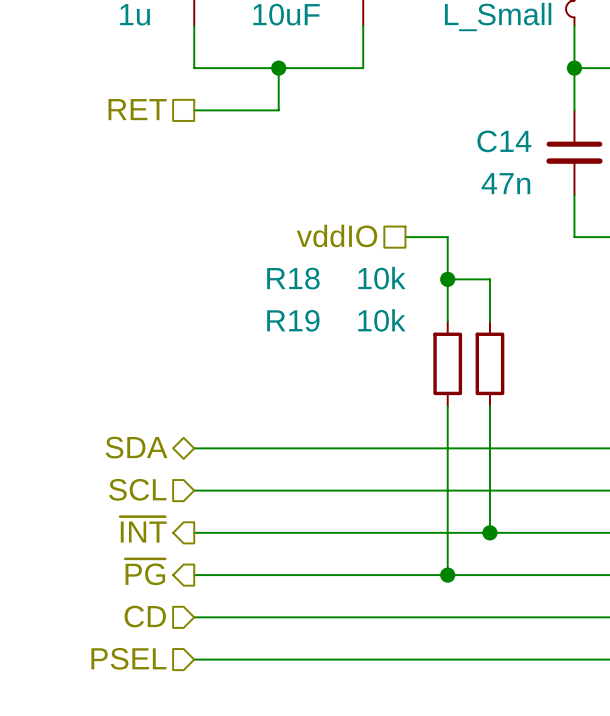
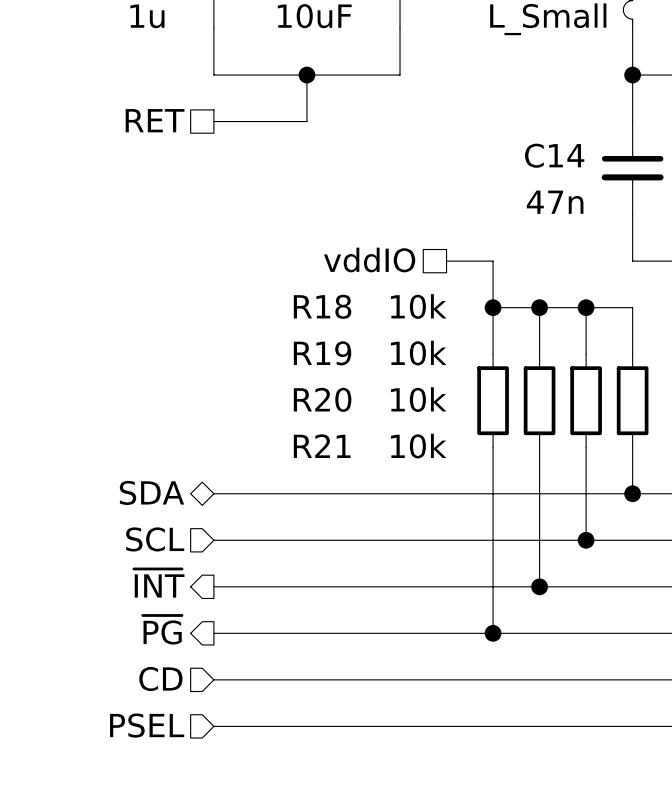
wire: none -> (539, 307) (632, 307) (632, 354)
junction: none -> (539, 307)
wire: none -> (586, 307) (586, 354)
junction: none -> (586, 307)
R20: none -> 10k (586, 400)
R21: none -> 10k (632, 400)
wire: none -> (586, 447) (586, 540)
wire: none -> (632, 447) (632, 493)
junction: none -> (632, 493)
junction: none -> (586, 540)

